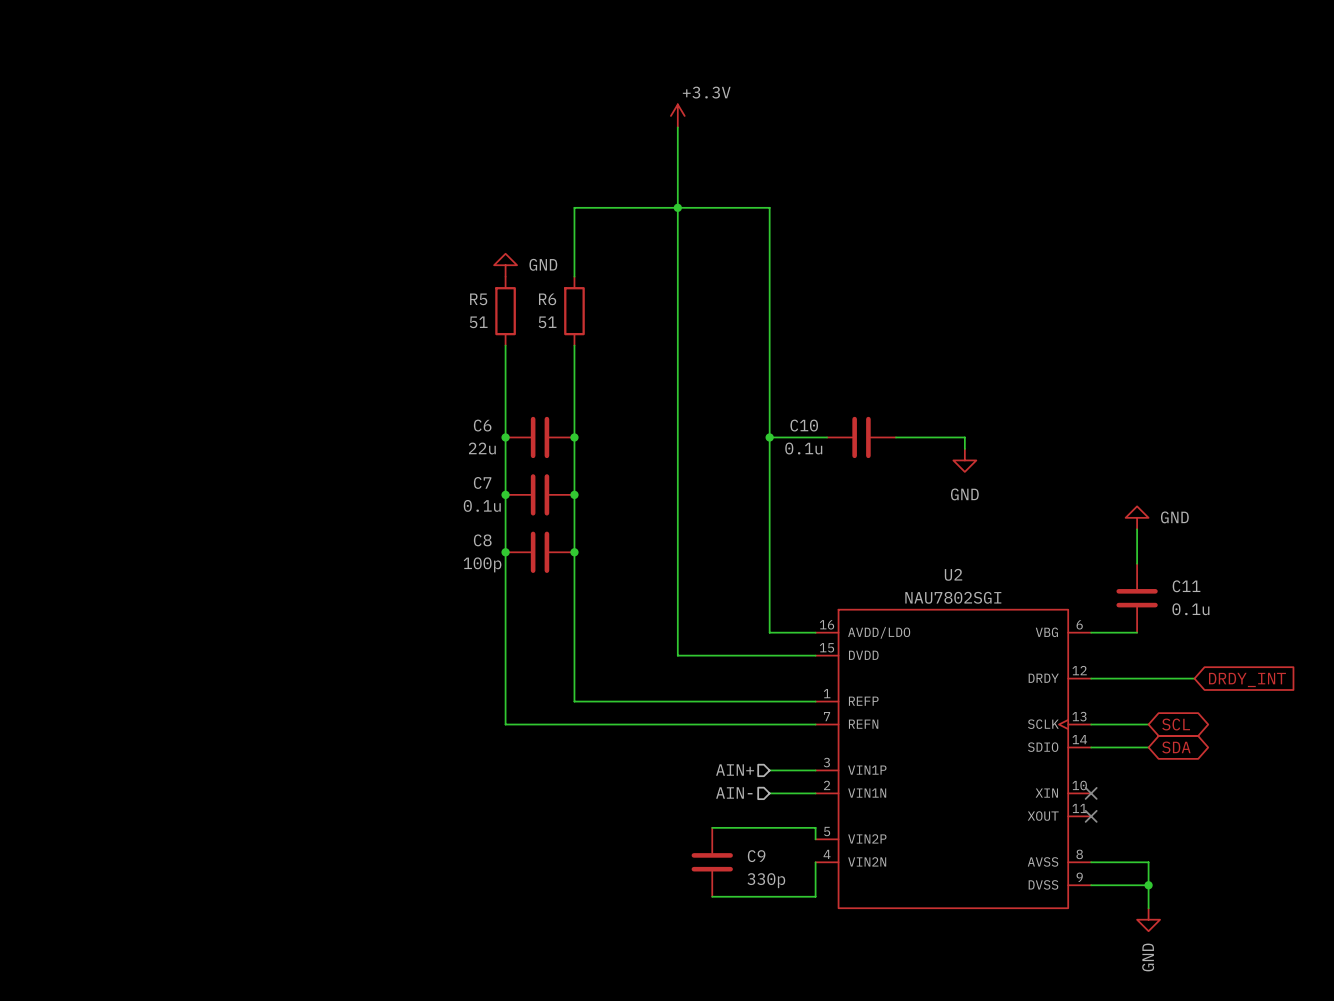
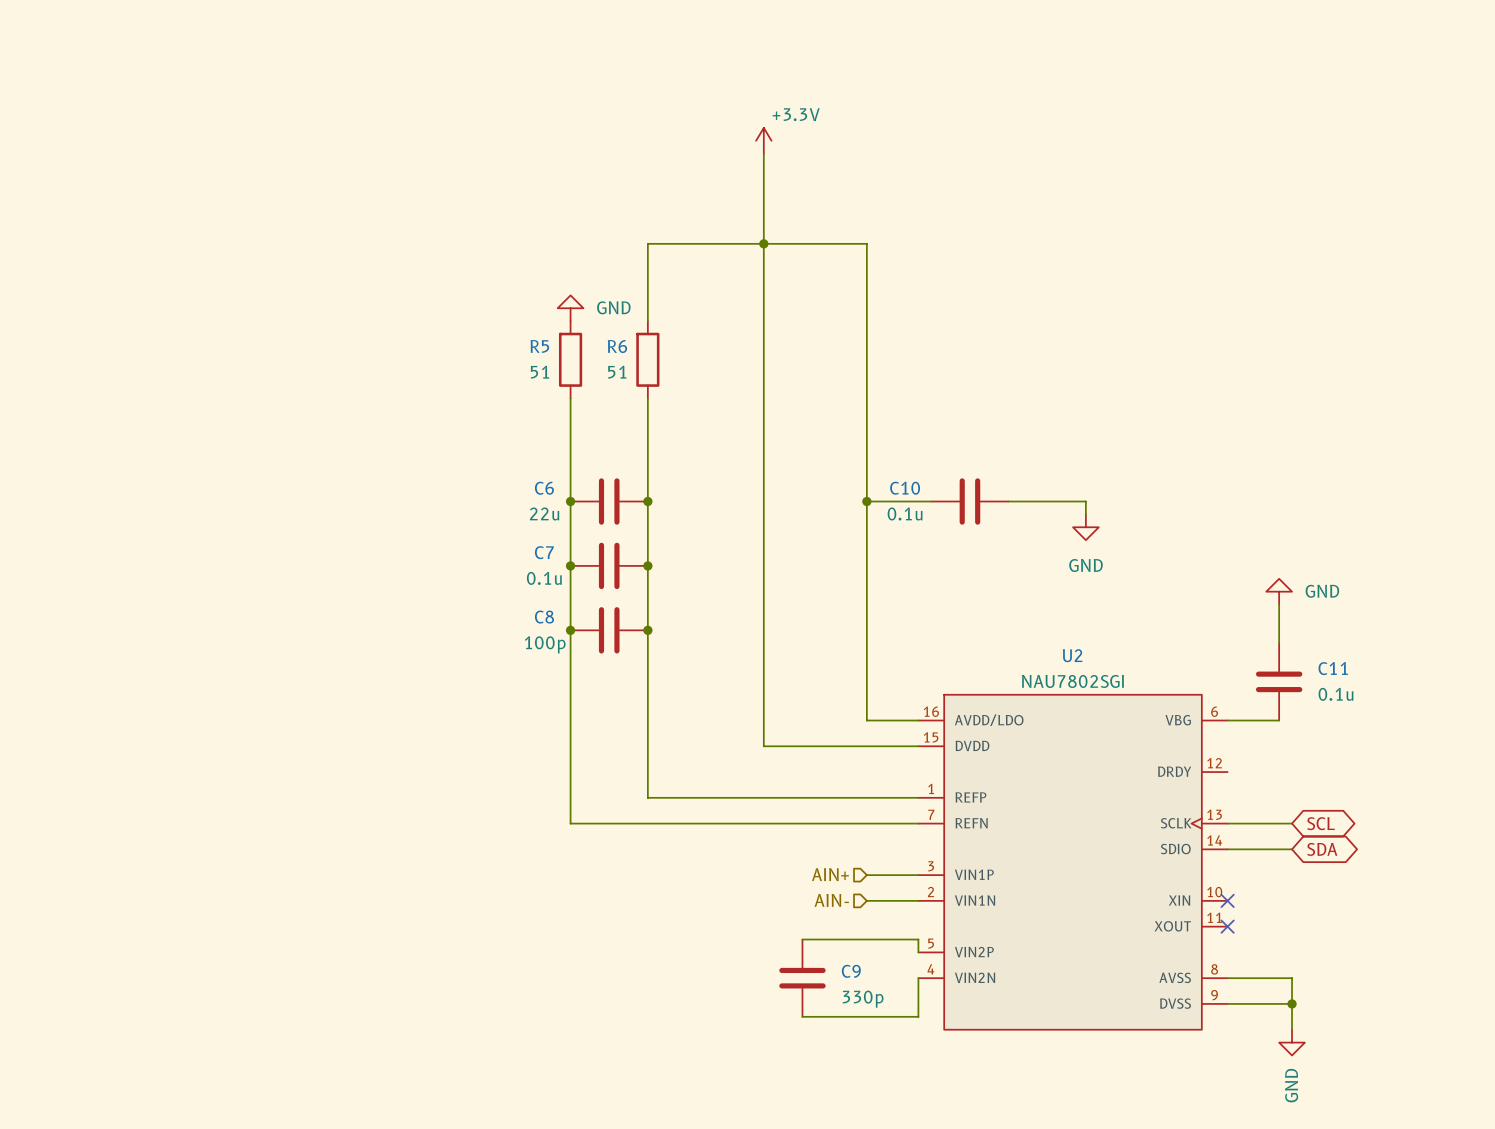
wire: (1091, 678) (1194, 678) -> none
global label: DRDY_INT (1247, 679) -> none

